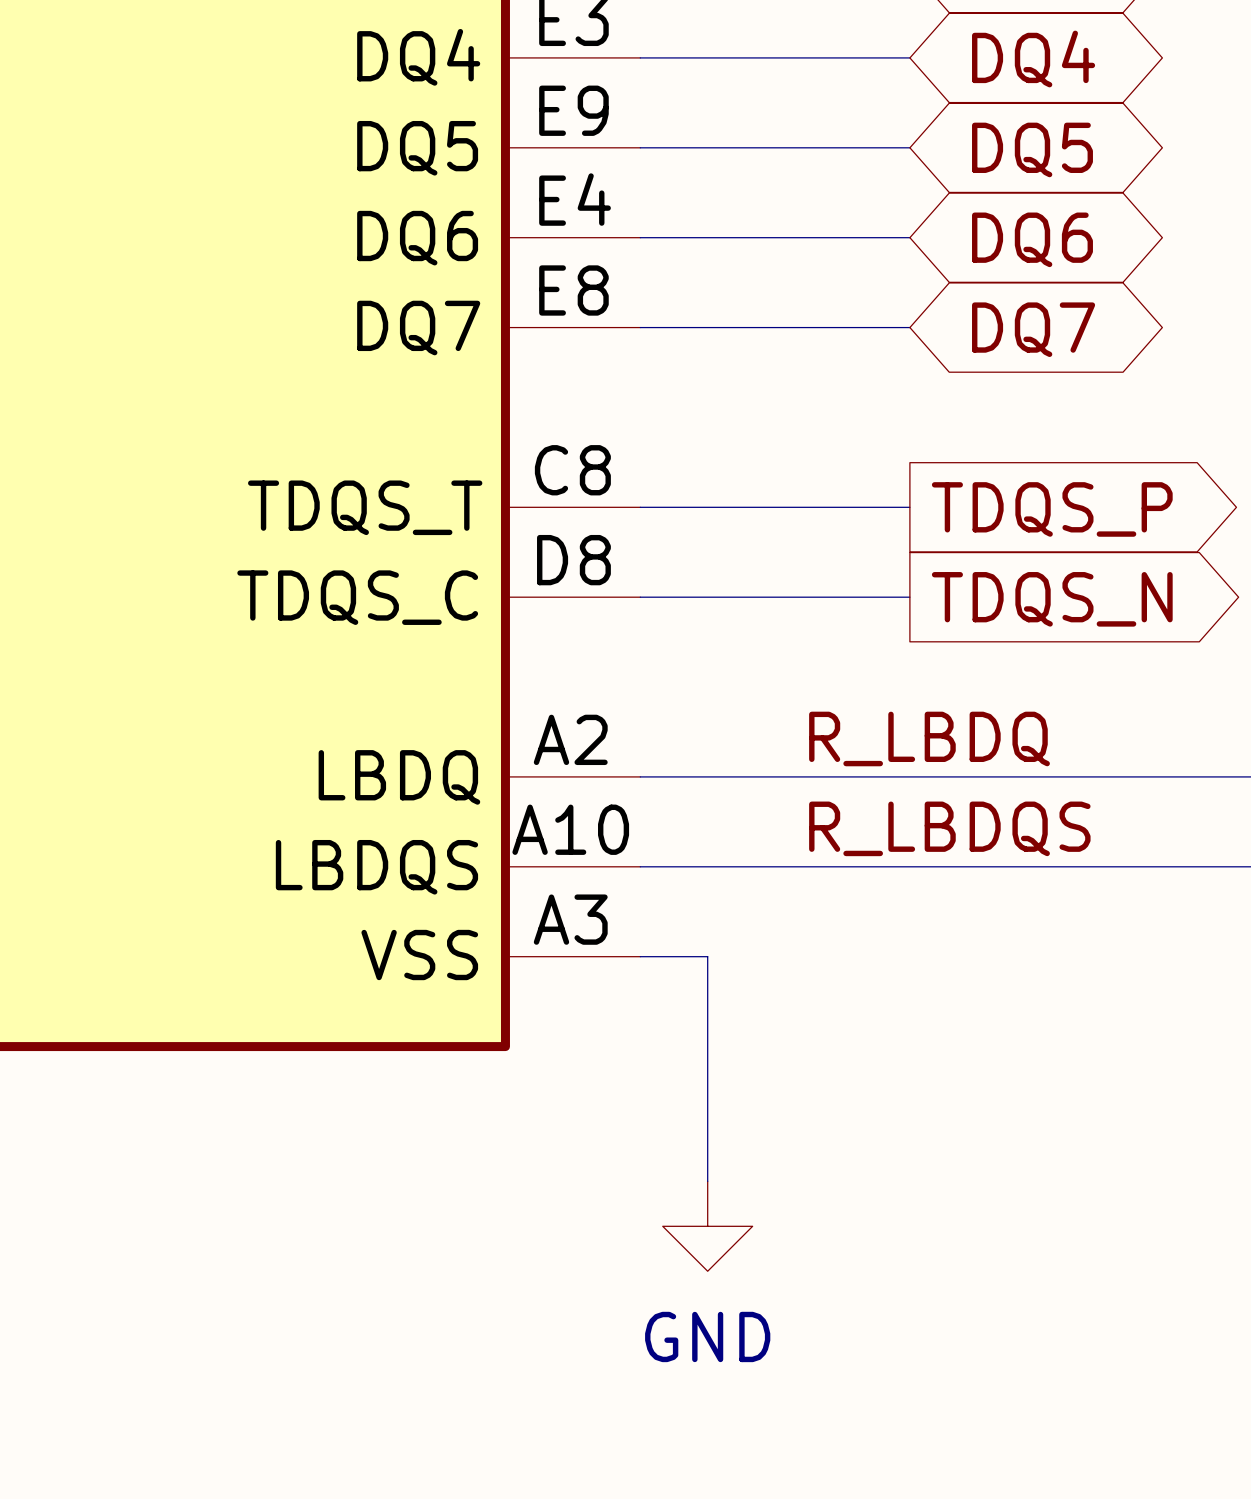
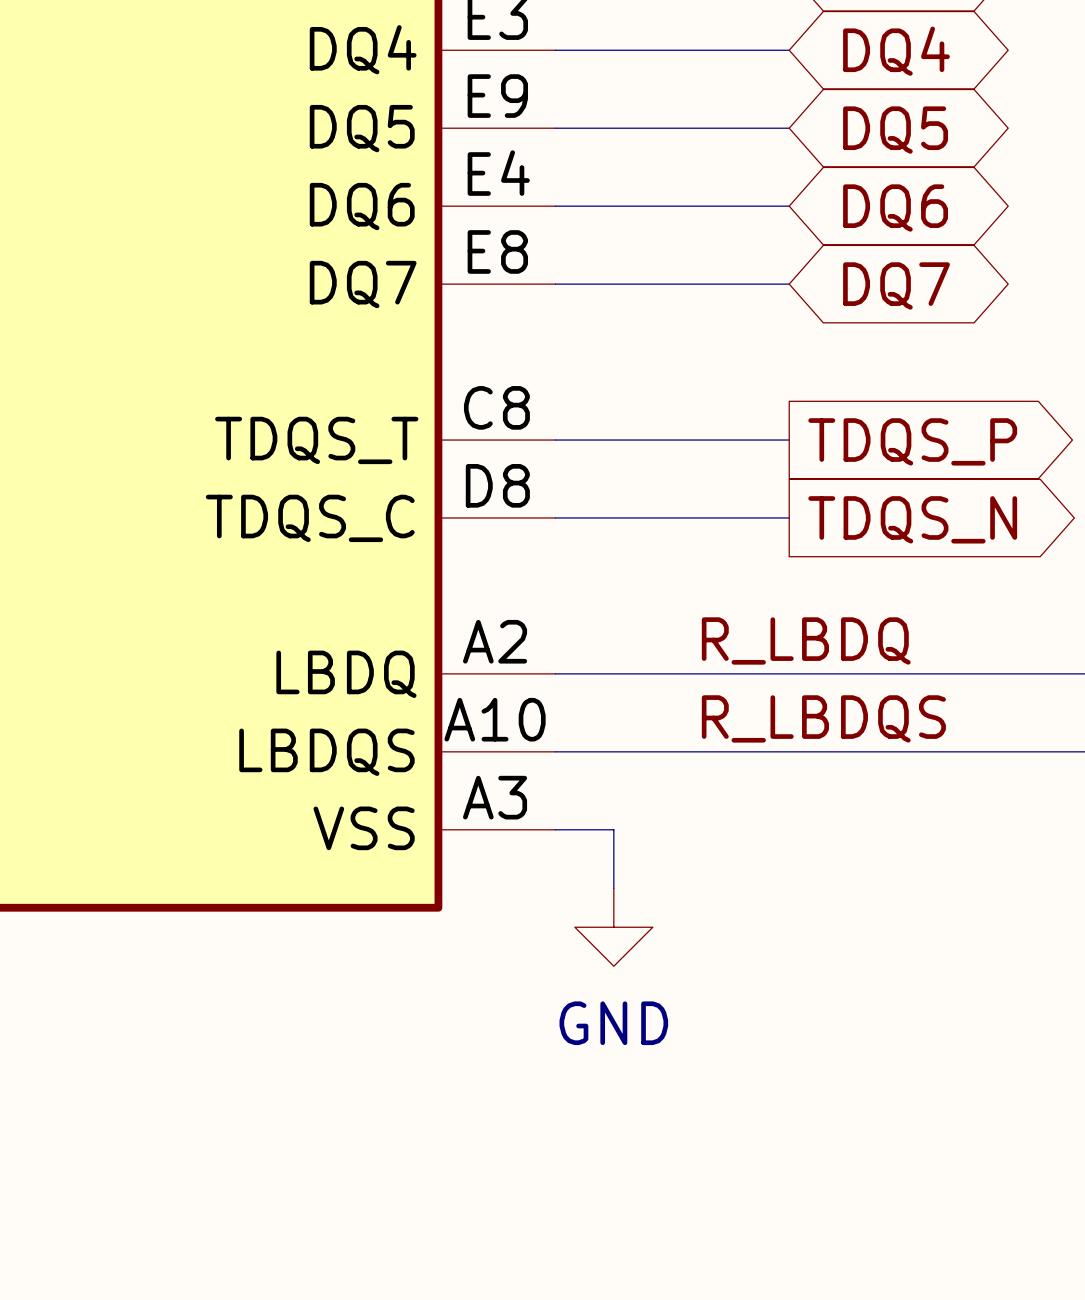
wire: (707, 1024) (707, 1181) -> none
power symbol position: GND (707, 1226) -> GND (613, 927)

